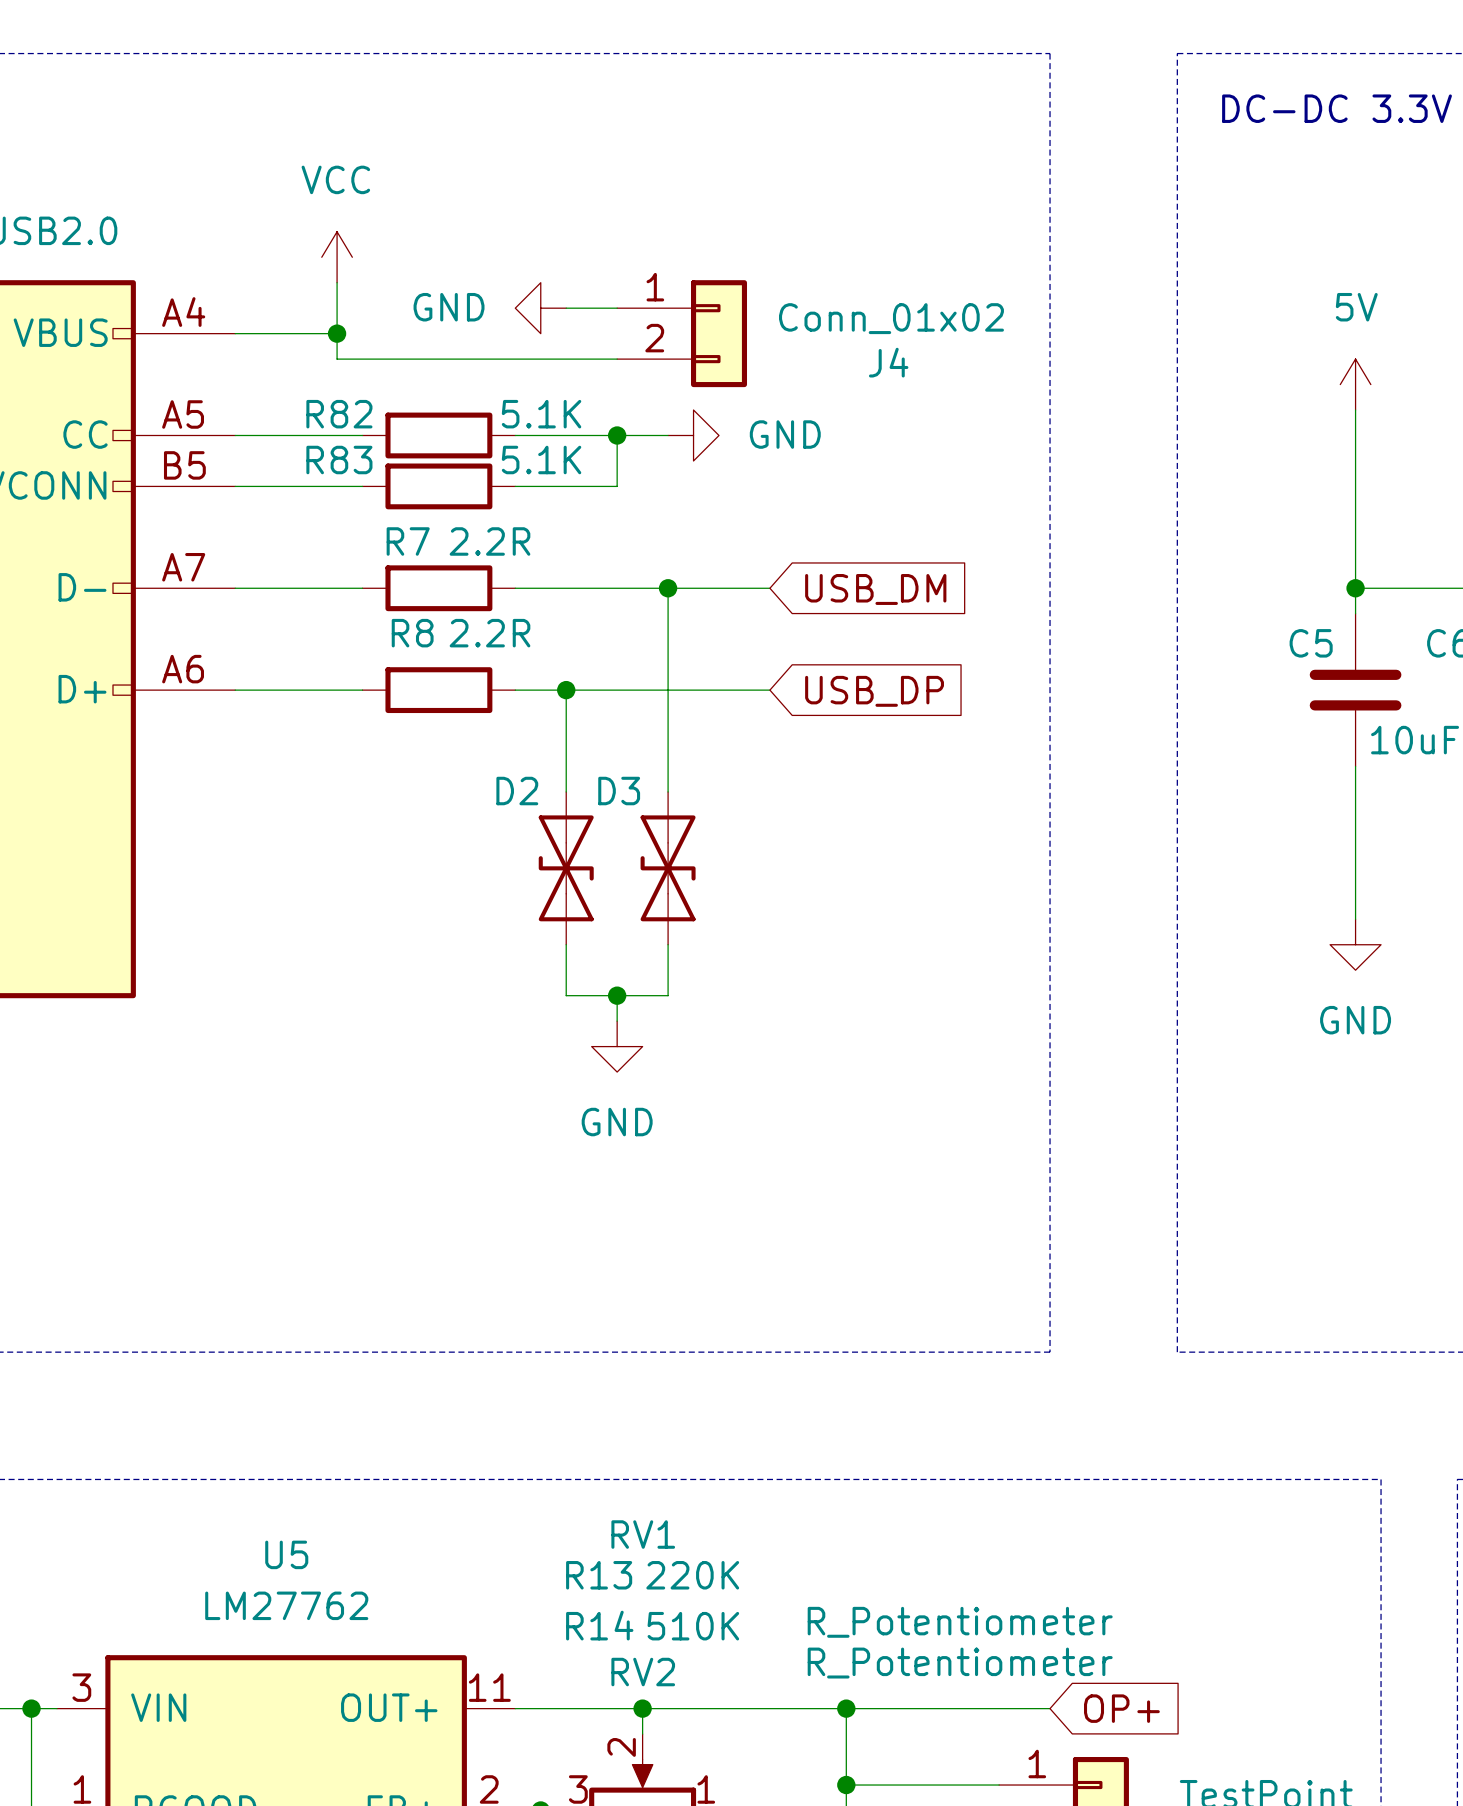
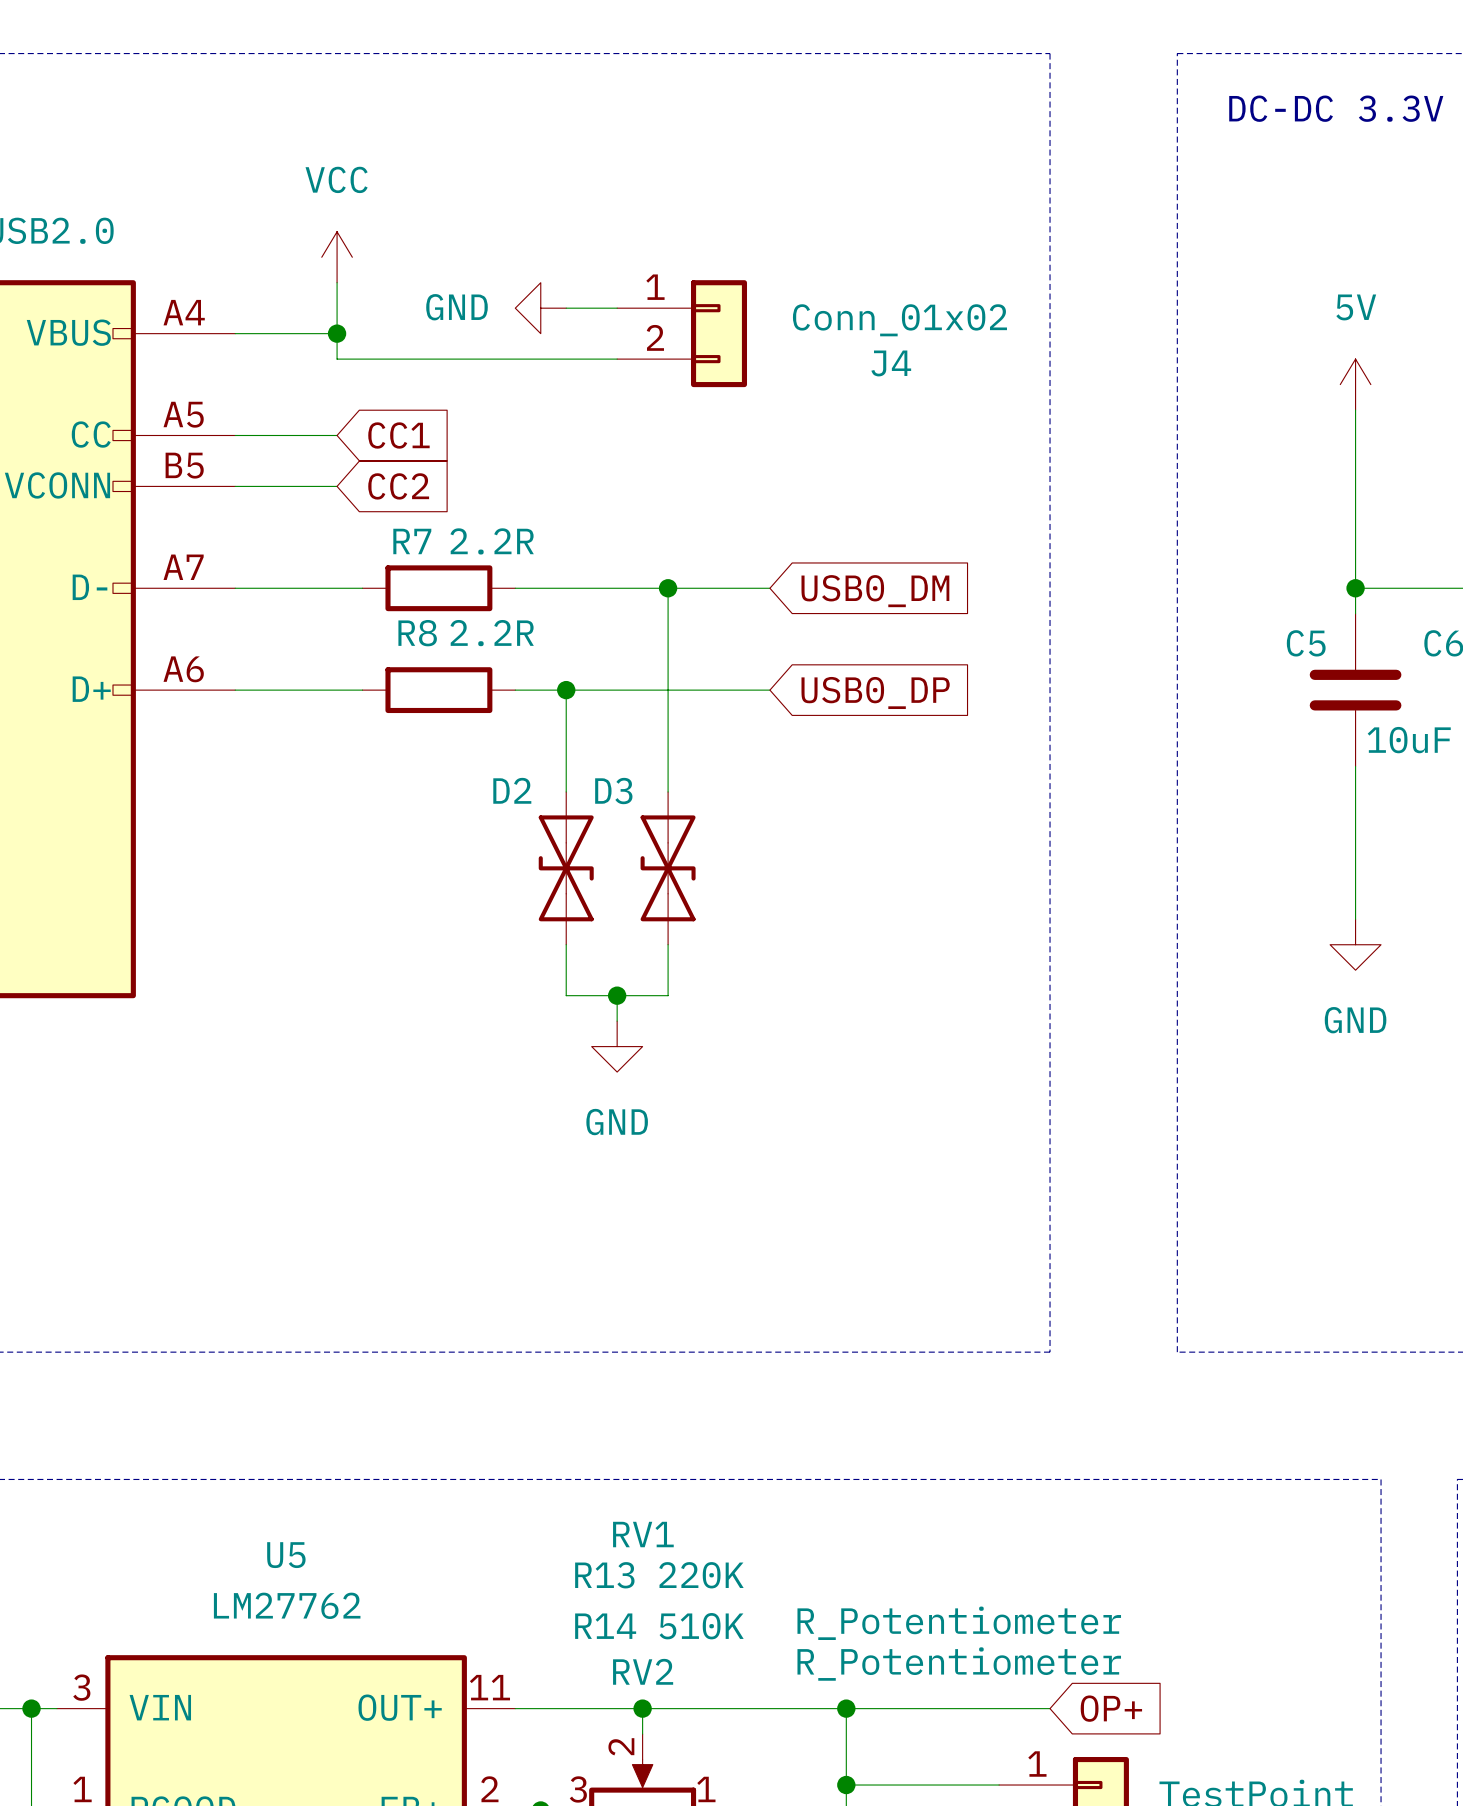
wire: (337, 435) (362, 435) -> none
global label: none -> CC1 (398, 435)
R82: 5.1K (438, 435) -> none
wire: (515, 435) (668, 435) -> none
wire: (617, 435) (617, 486) (515, 486) -> none
junction: (617, 435) -> none
power symbol: GND (693, 435) -> none
wire: (337, 486) (362, 486) -> none
global label: none -> CC2 (398, 486)
R83: 5.1K (438, 486) -> none
global label: USB_DM (875, 589) -> USB0_DM (875, 591)
global label: USB_DP (874, 691) -> USB0_DP (875, 692)

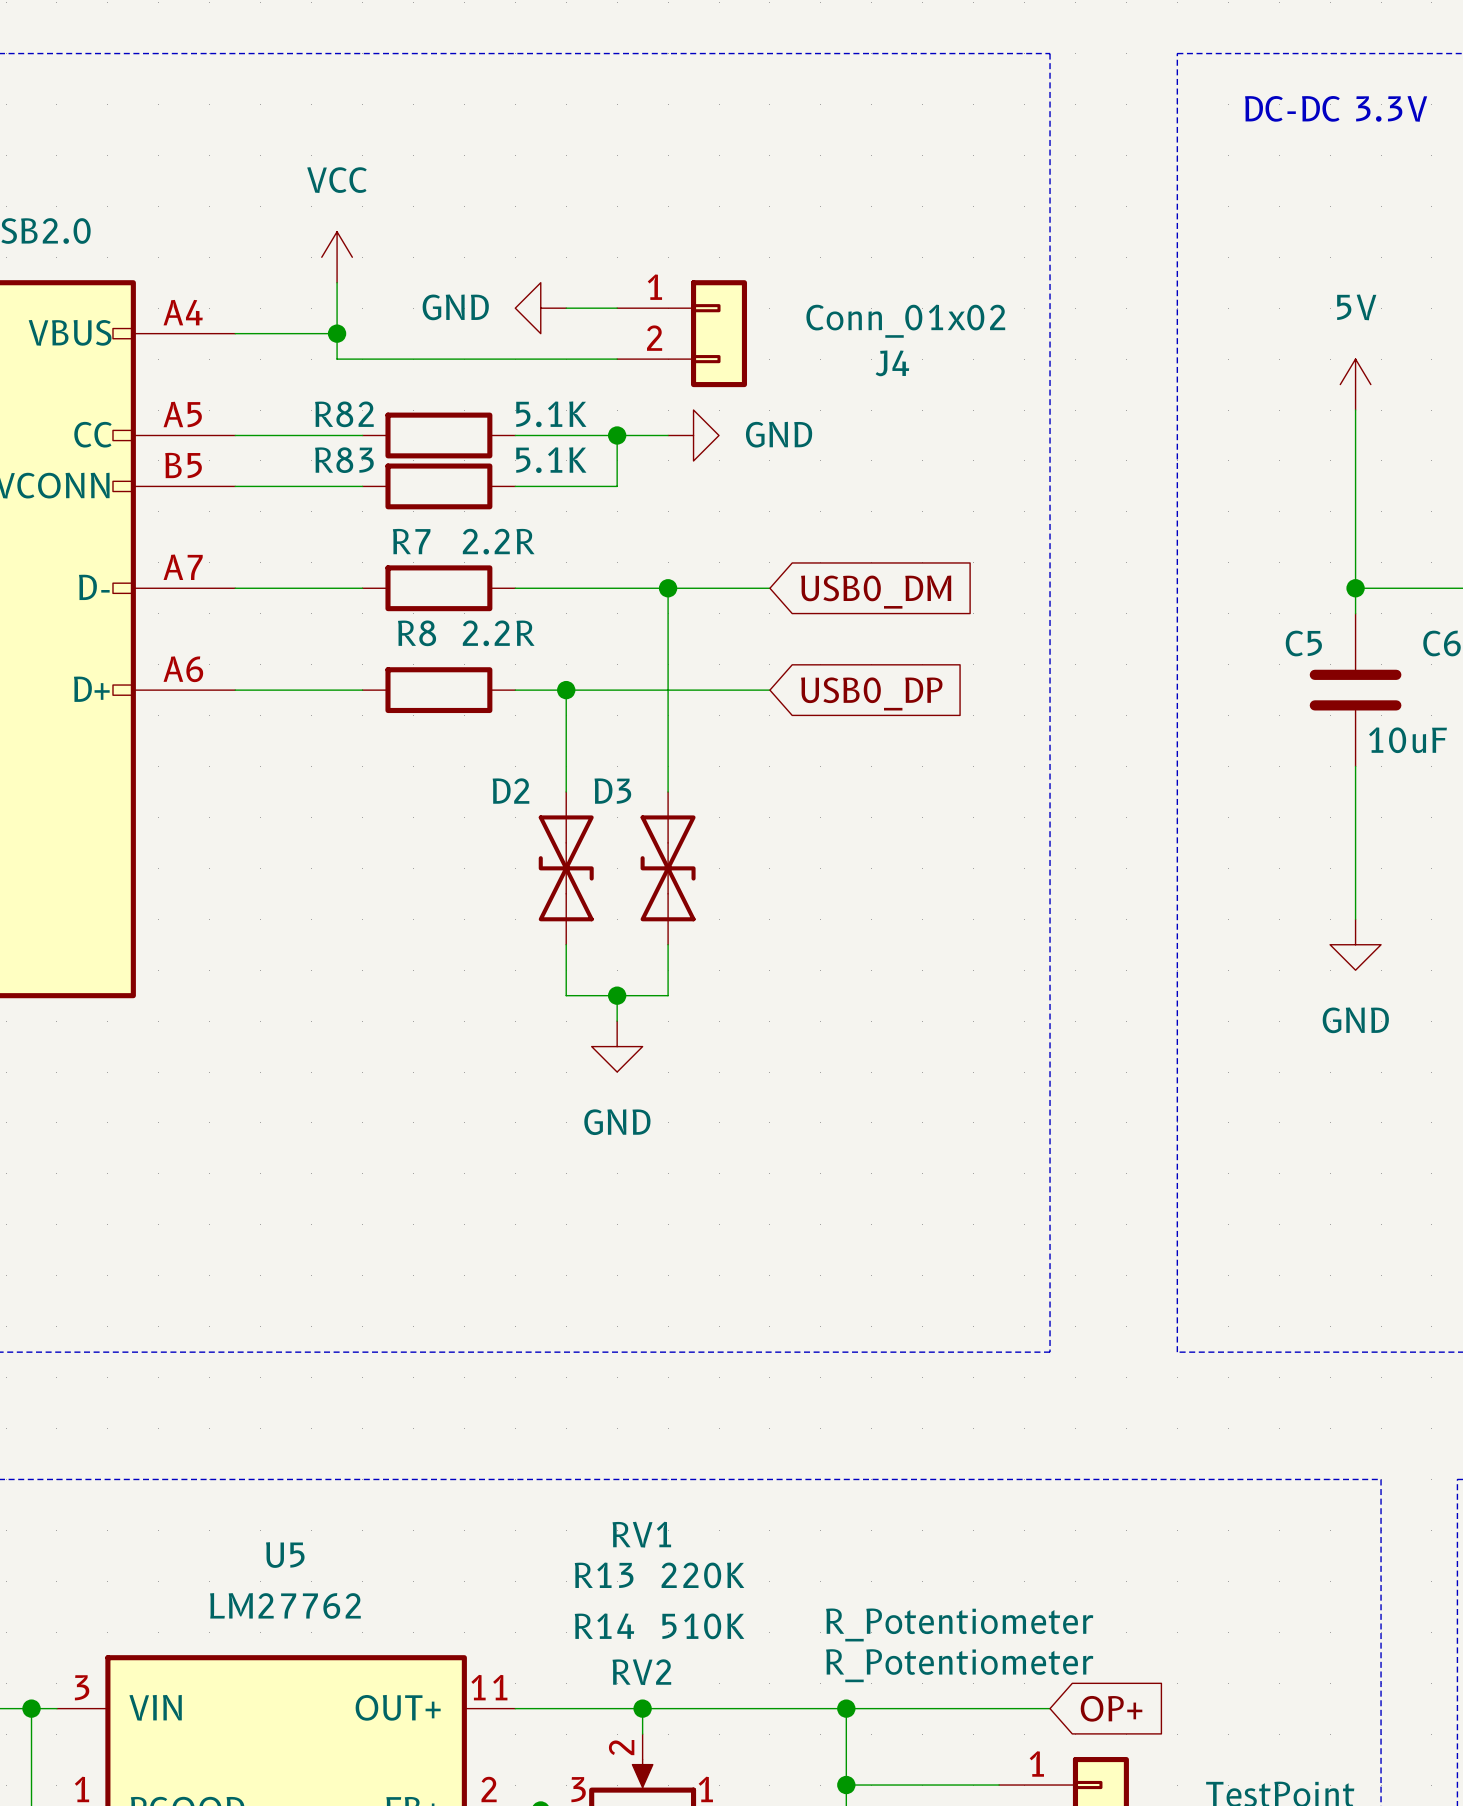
wire: none -> (337, 435) (362, 435)
global label: CC1 (398, 435) -> none
R82: none -> 5.1K (438, 435)
wire: none -> (515, 435) (668, 435)
wire: none -> (617, 435) (617, 486) (515, 486)
junction: none -> (617, 435)
power symbol: none -> GND (693, 435)
wire: none -> (337, 486) (362, 486)
global label: CC2 (398, 486) -> none
R83: none -> 5.1K (438, 486)

